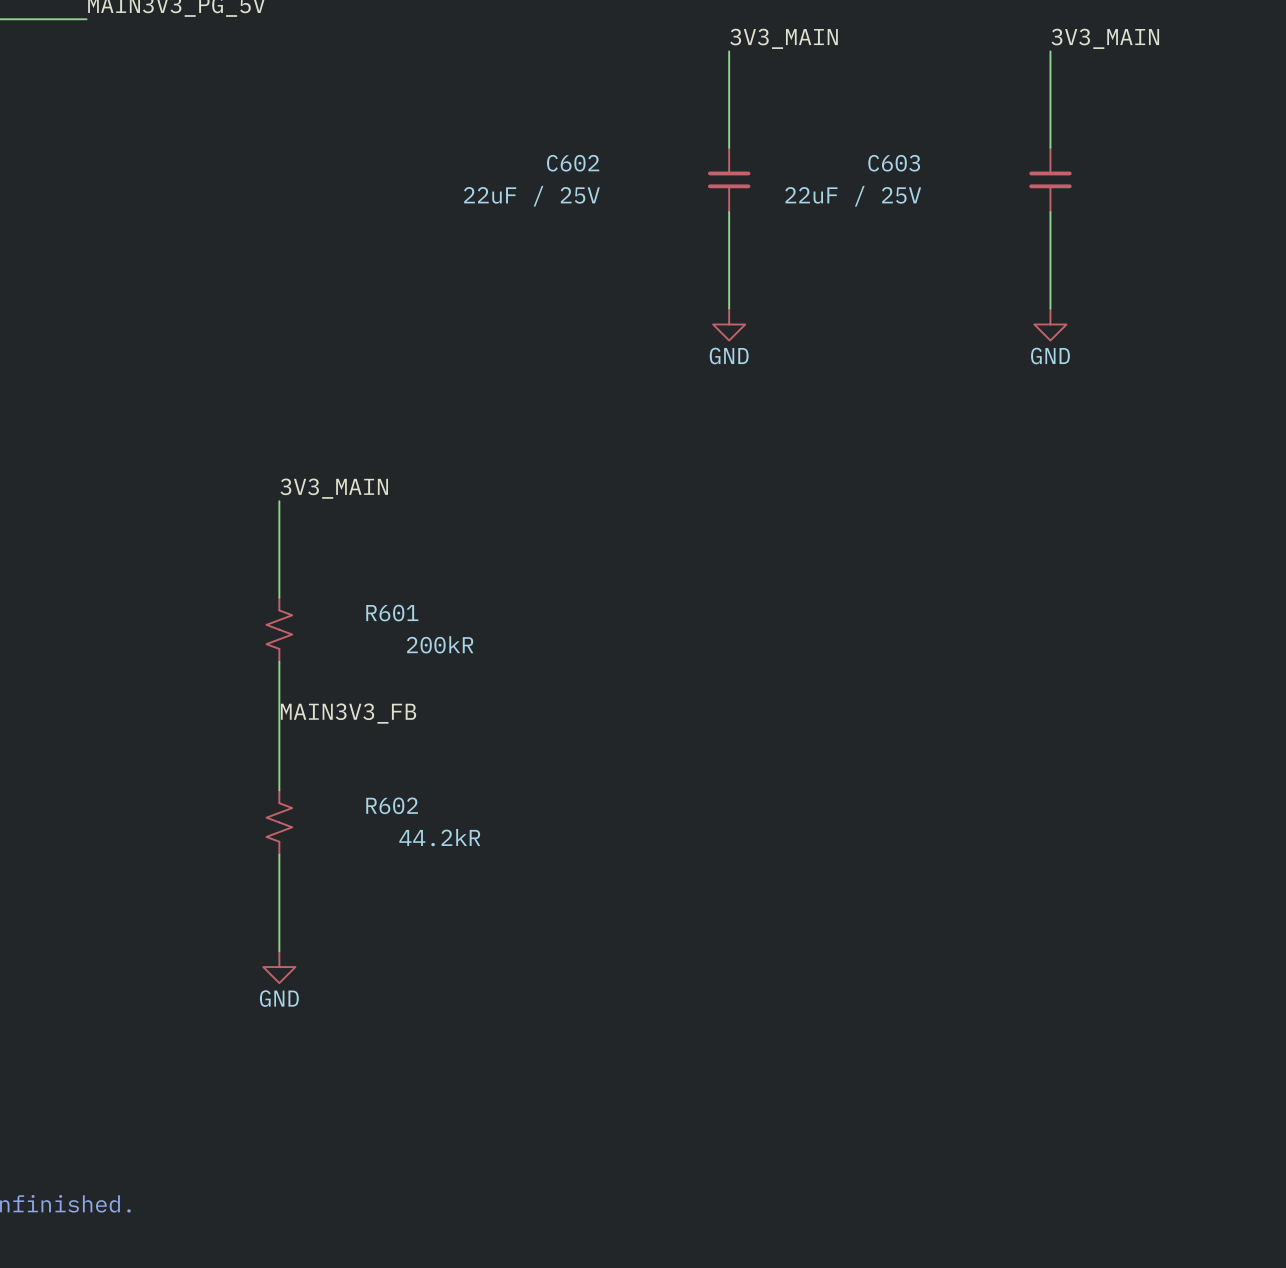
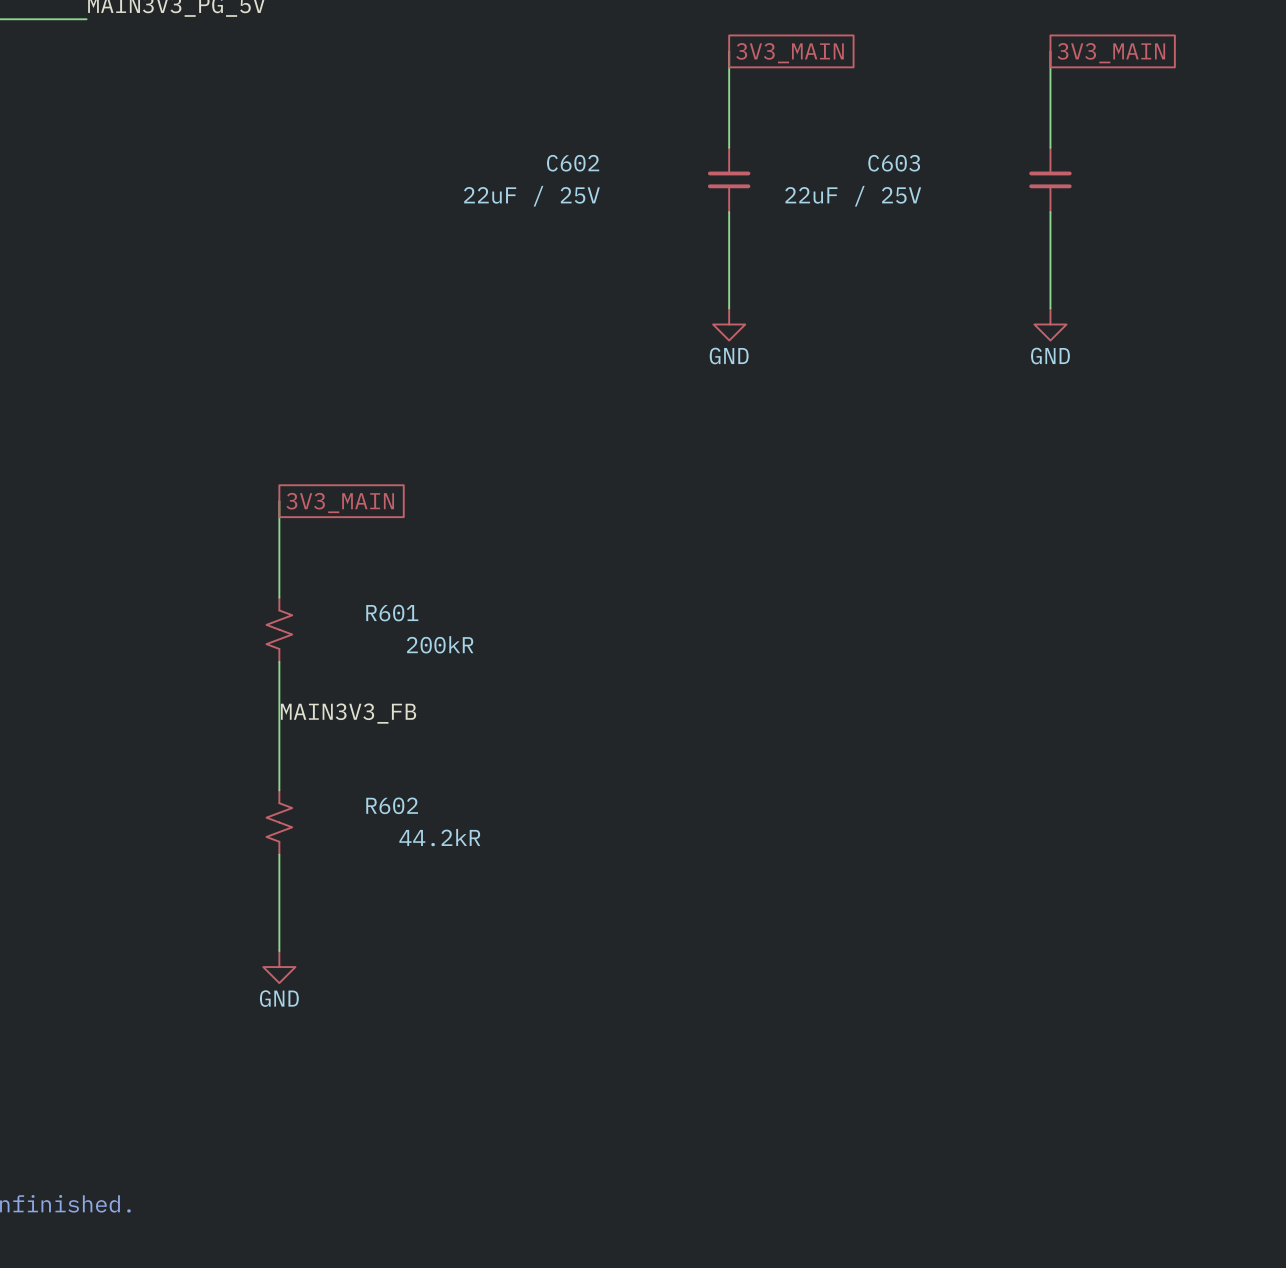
label: 3V3_MAIN (784, 38) -> none
label: 3V3_MAIN (1105, 38) -> none
global label: none -> 3V3_MAIN (790, 53)
global label: none -> 3V3_MAIN (1111, 53)
label: 3V3_MAIN (334, 488) -> none
global label: none -> 3V3_MAIN (340, 503)

